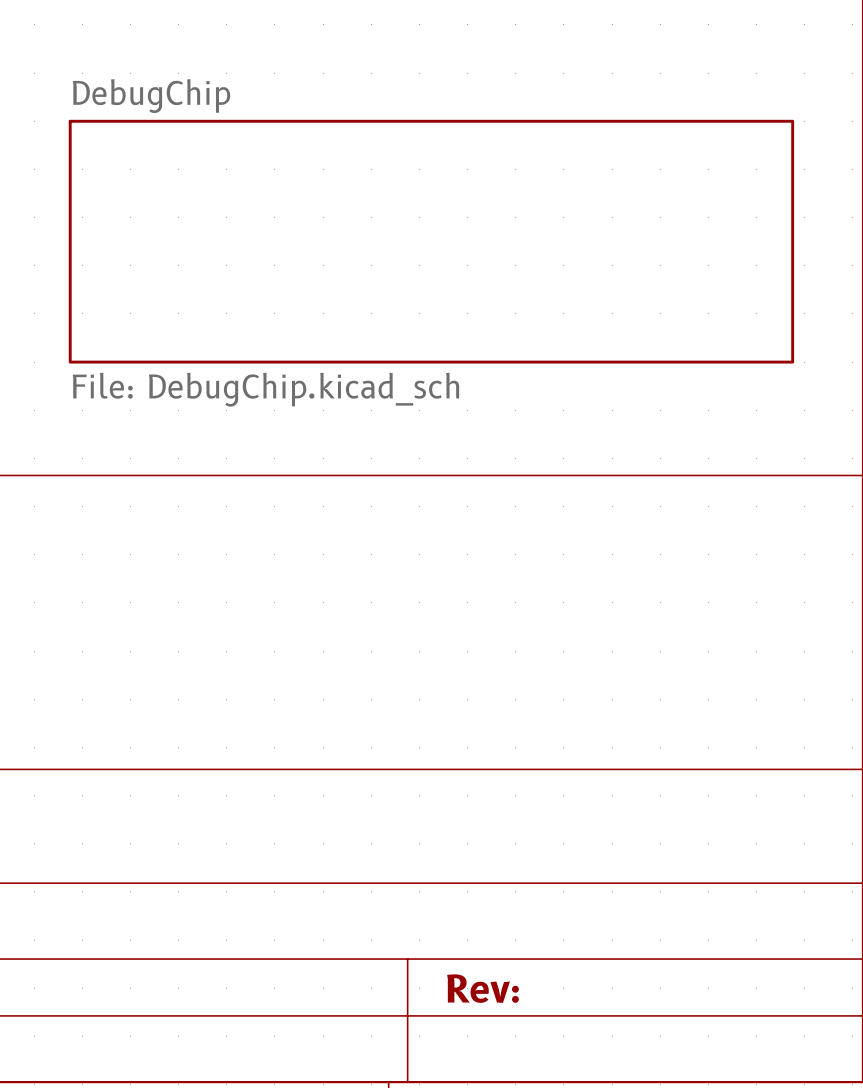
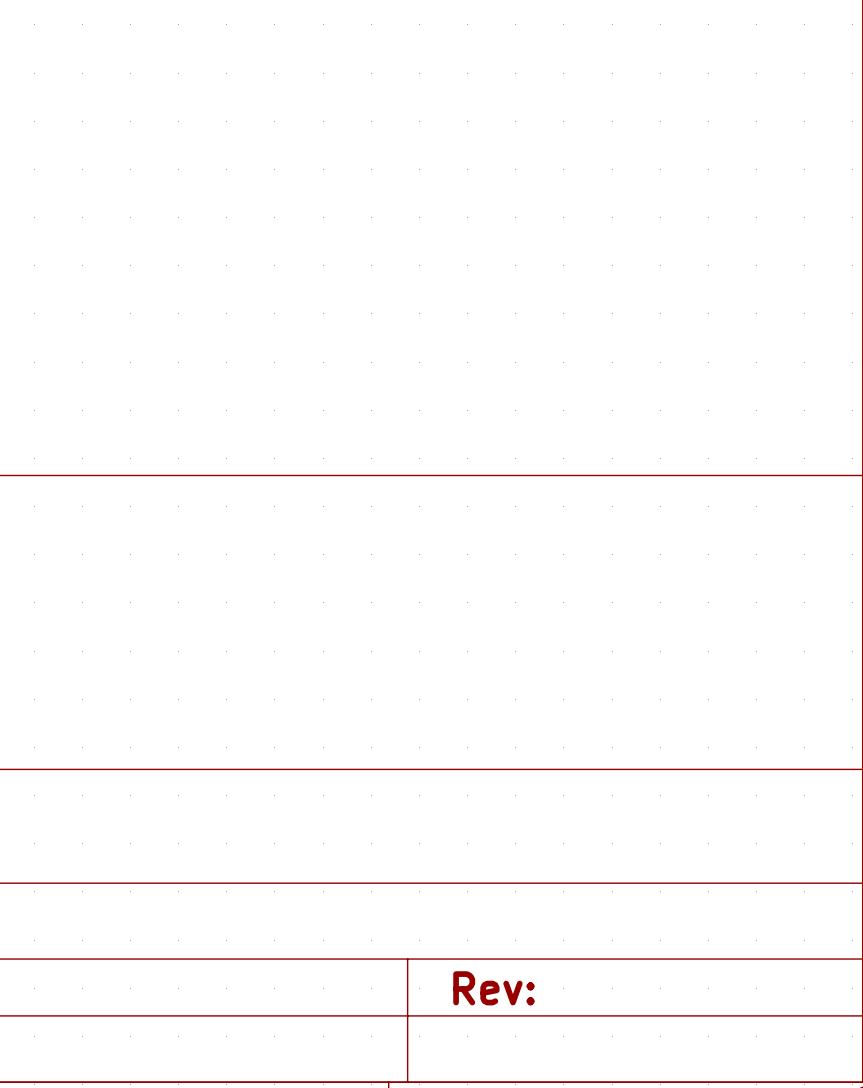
sheet DebugChip: File: DebugChip.kicad_sch (431, 241) -> none

